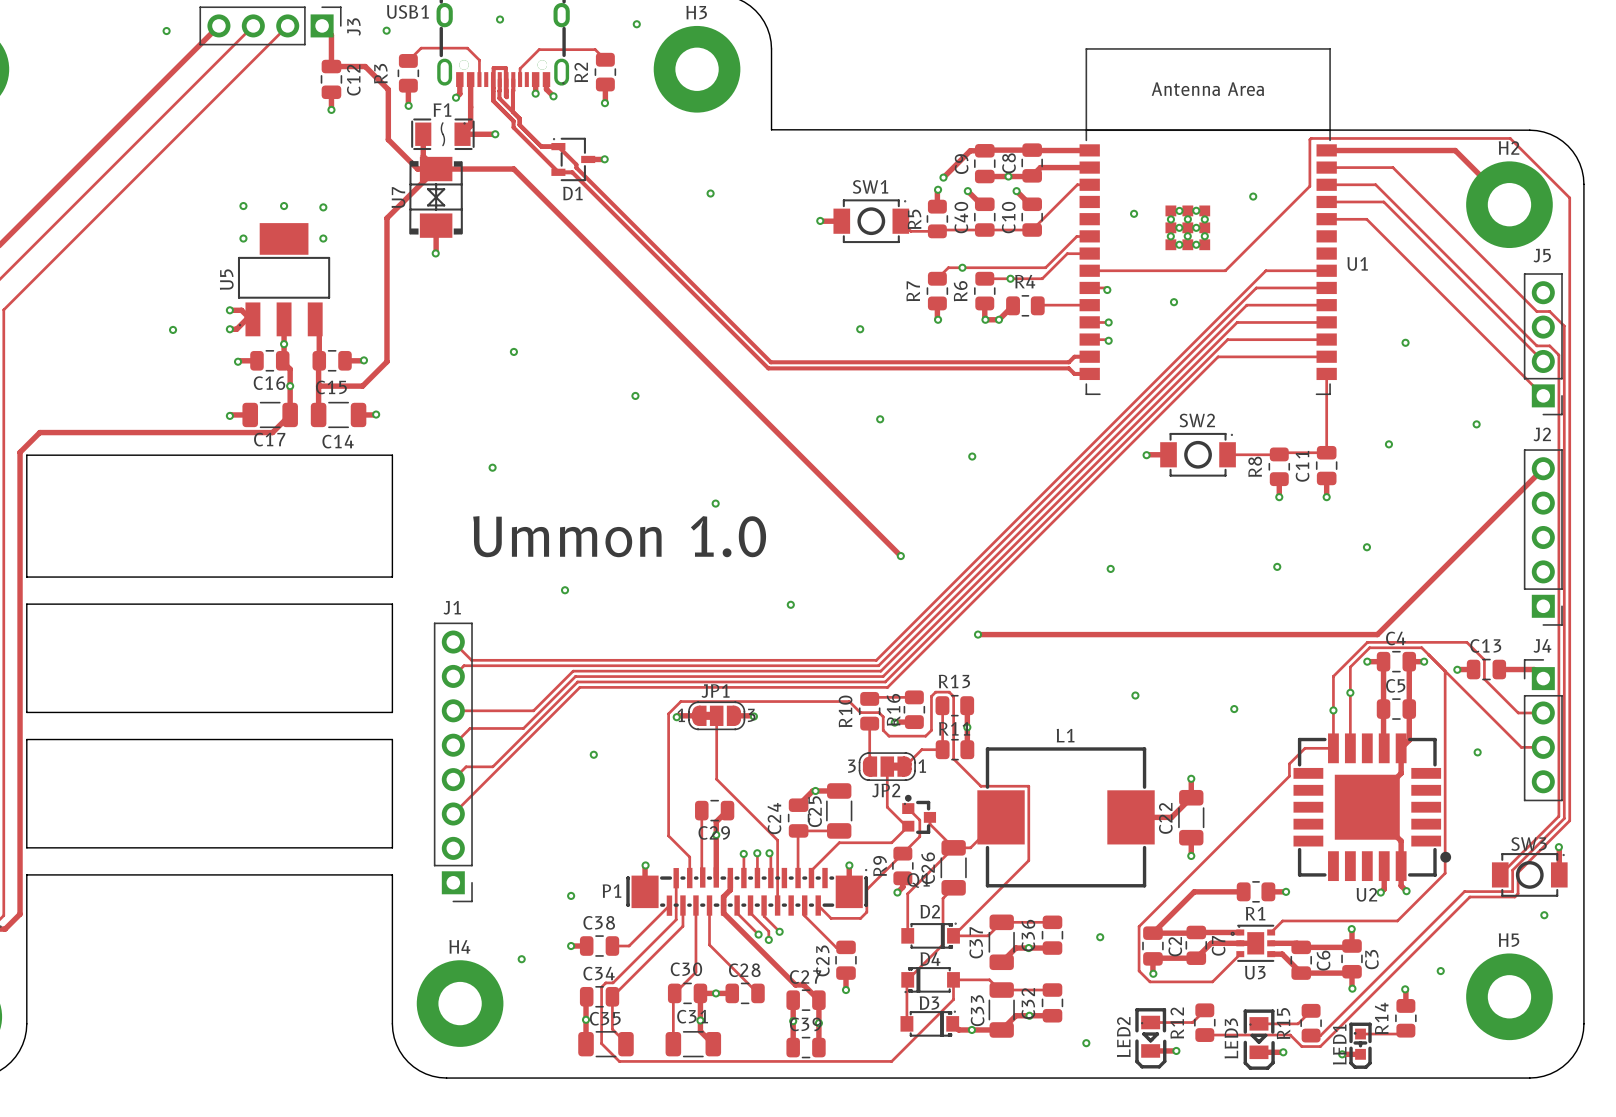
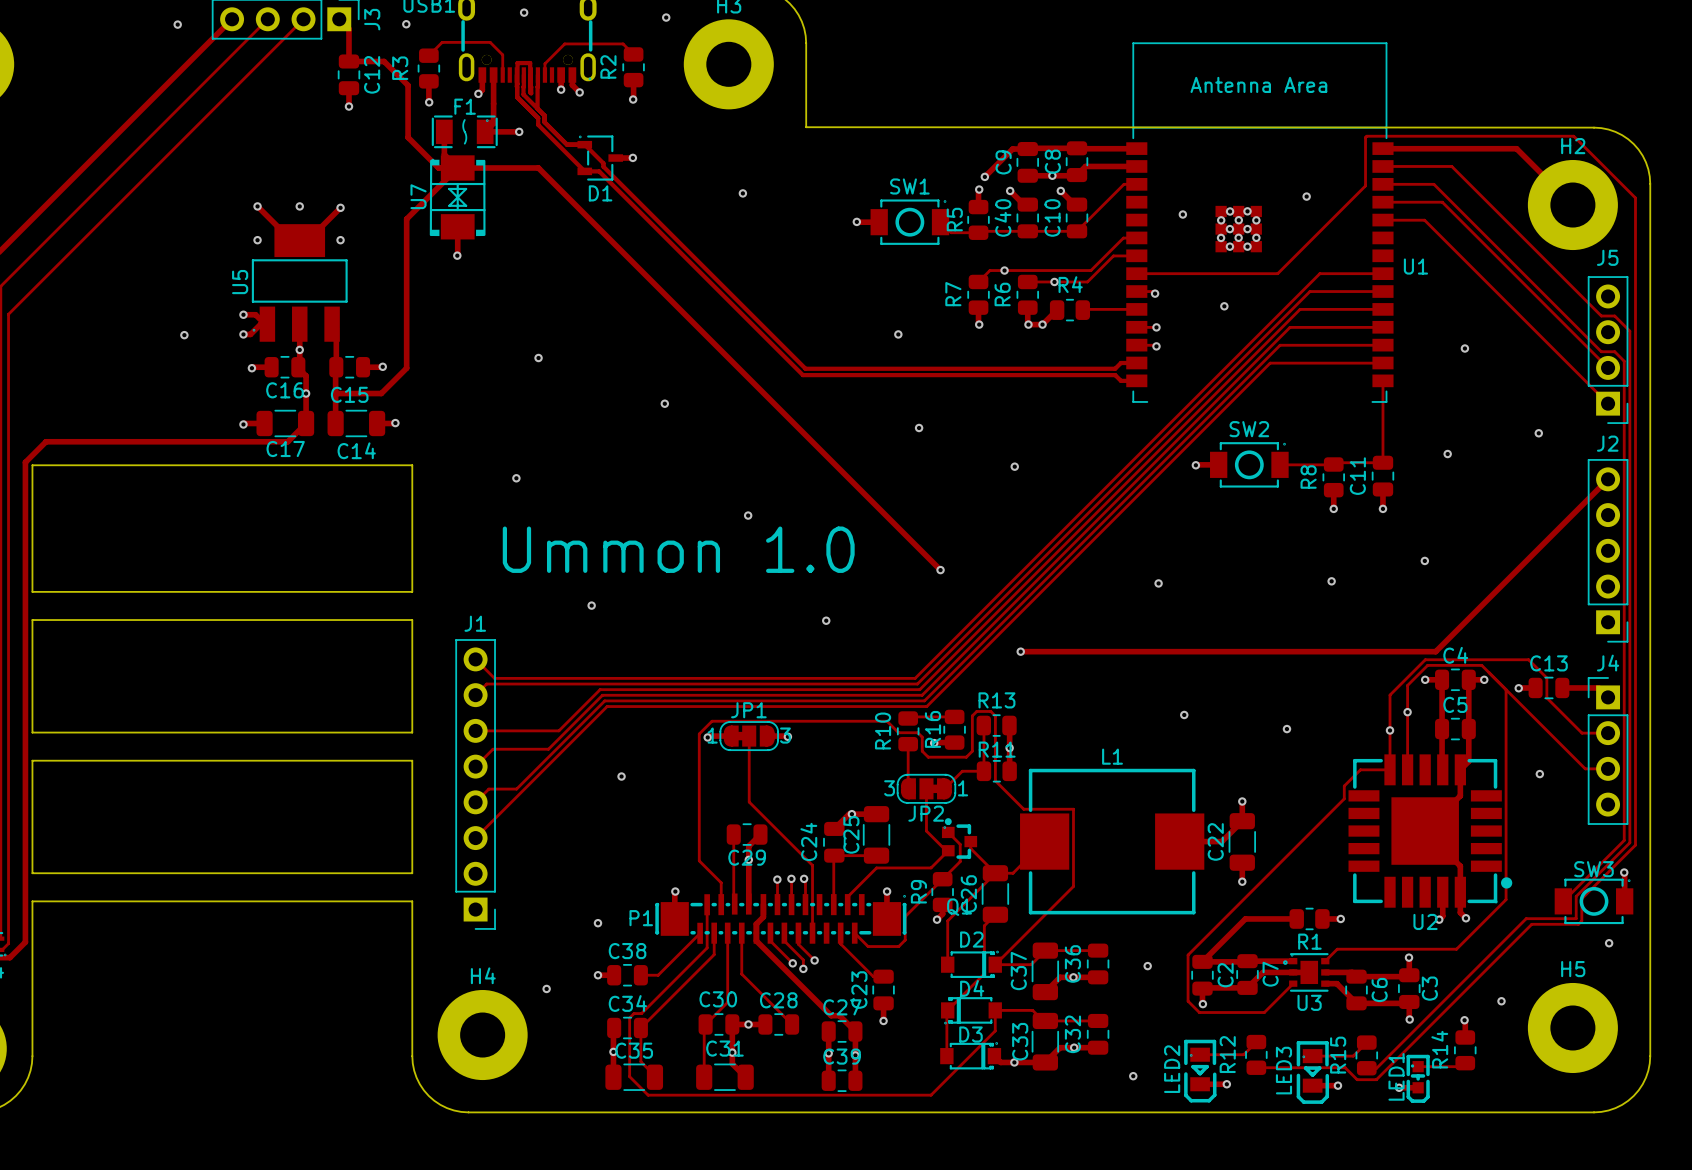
track: none -> (257, 206) (291, 240)
track: none -> (340, 207) (307, 240)

